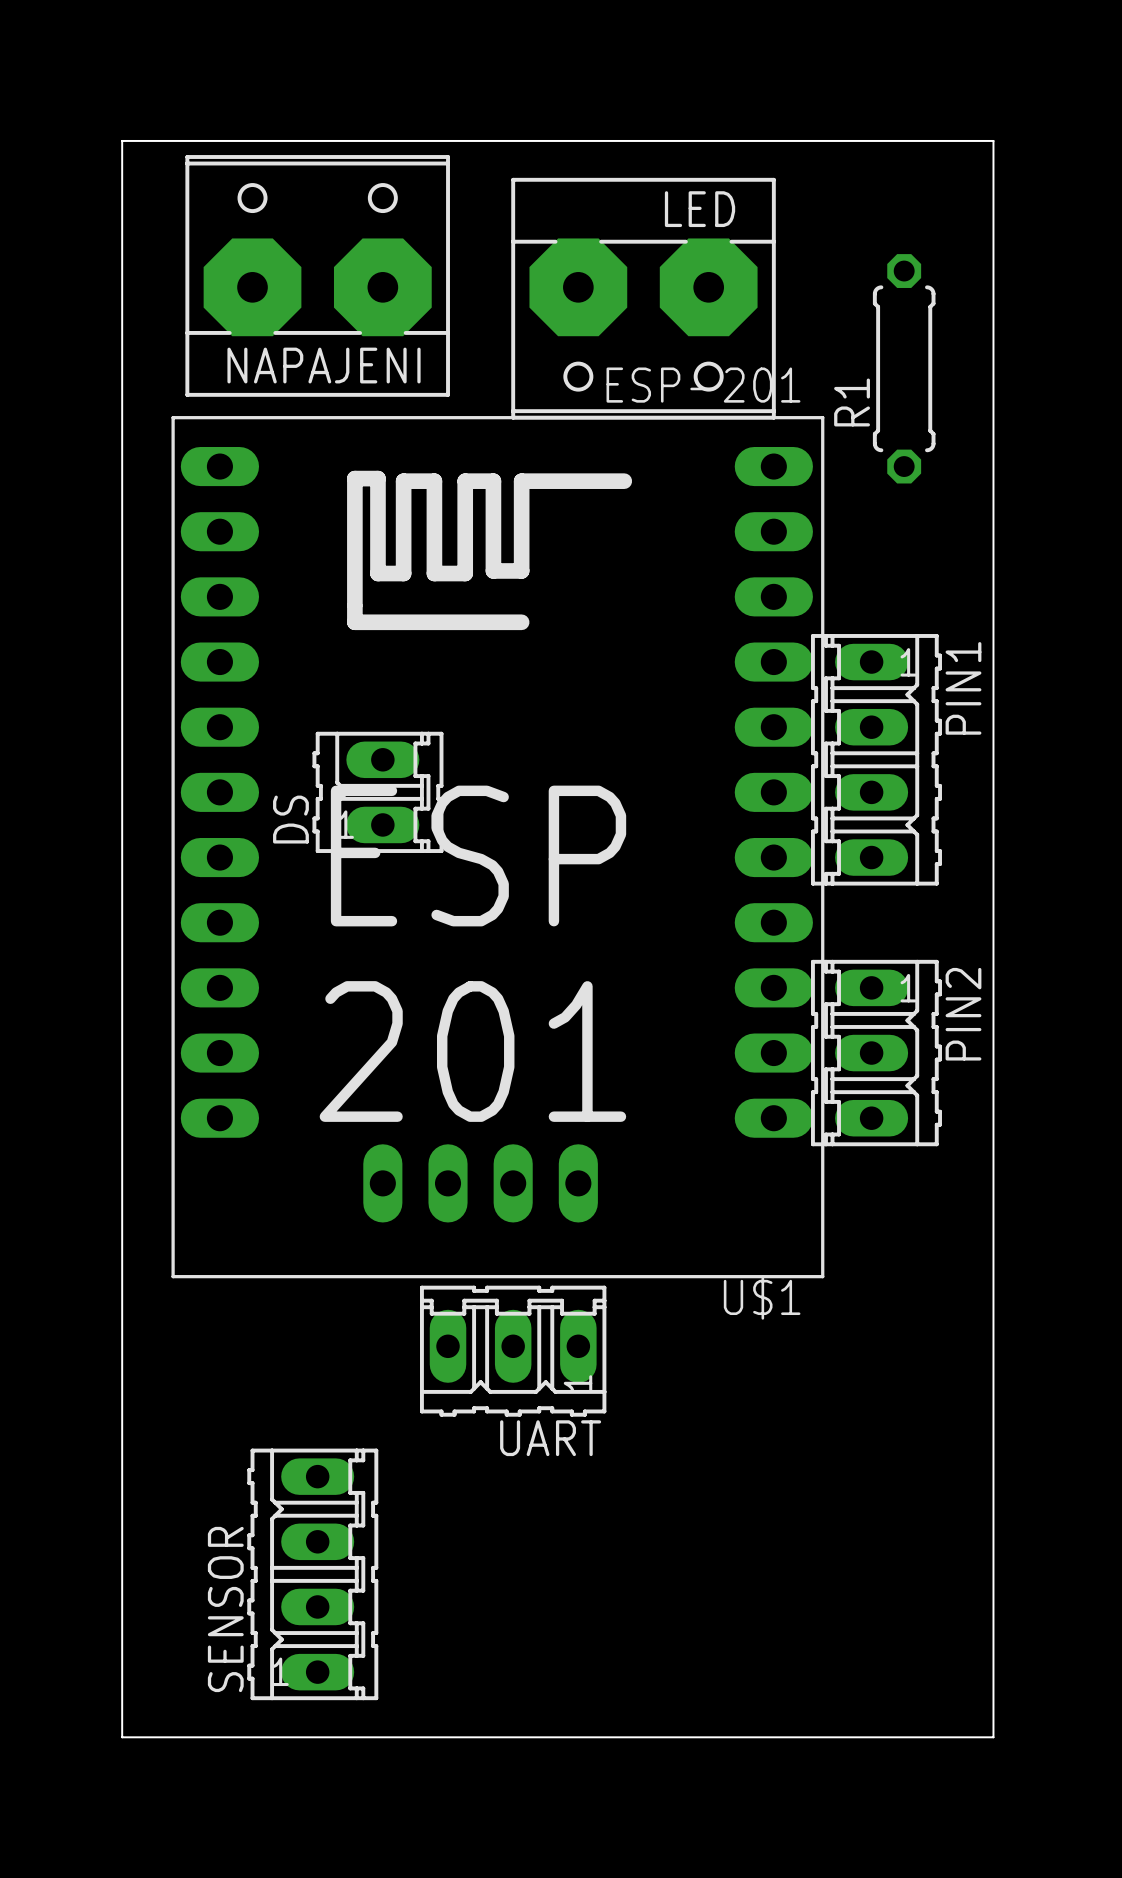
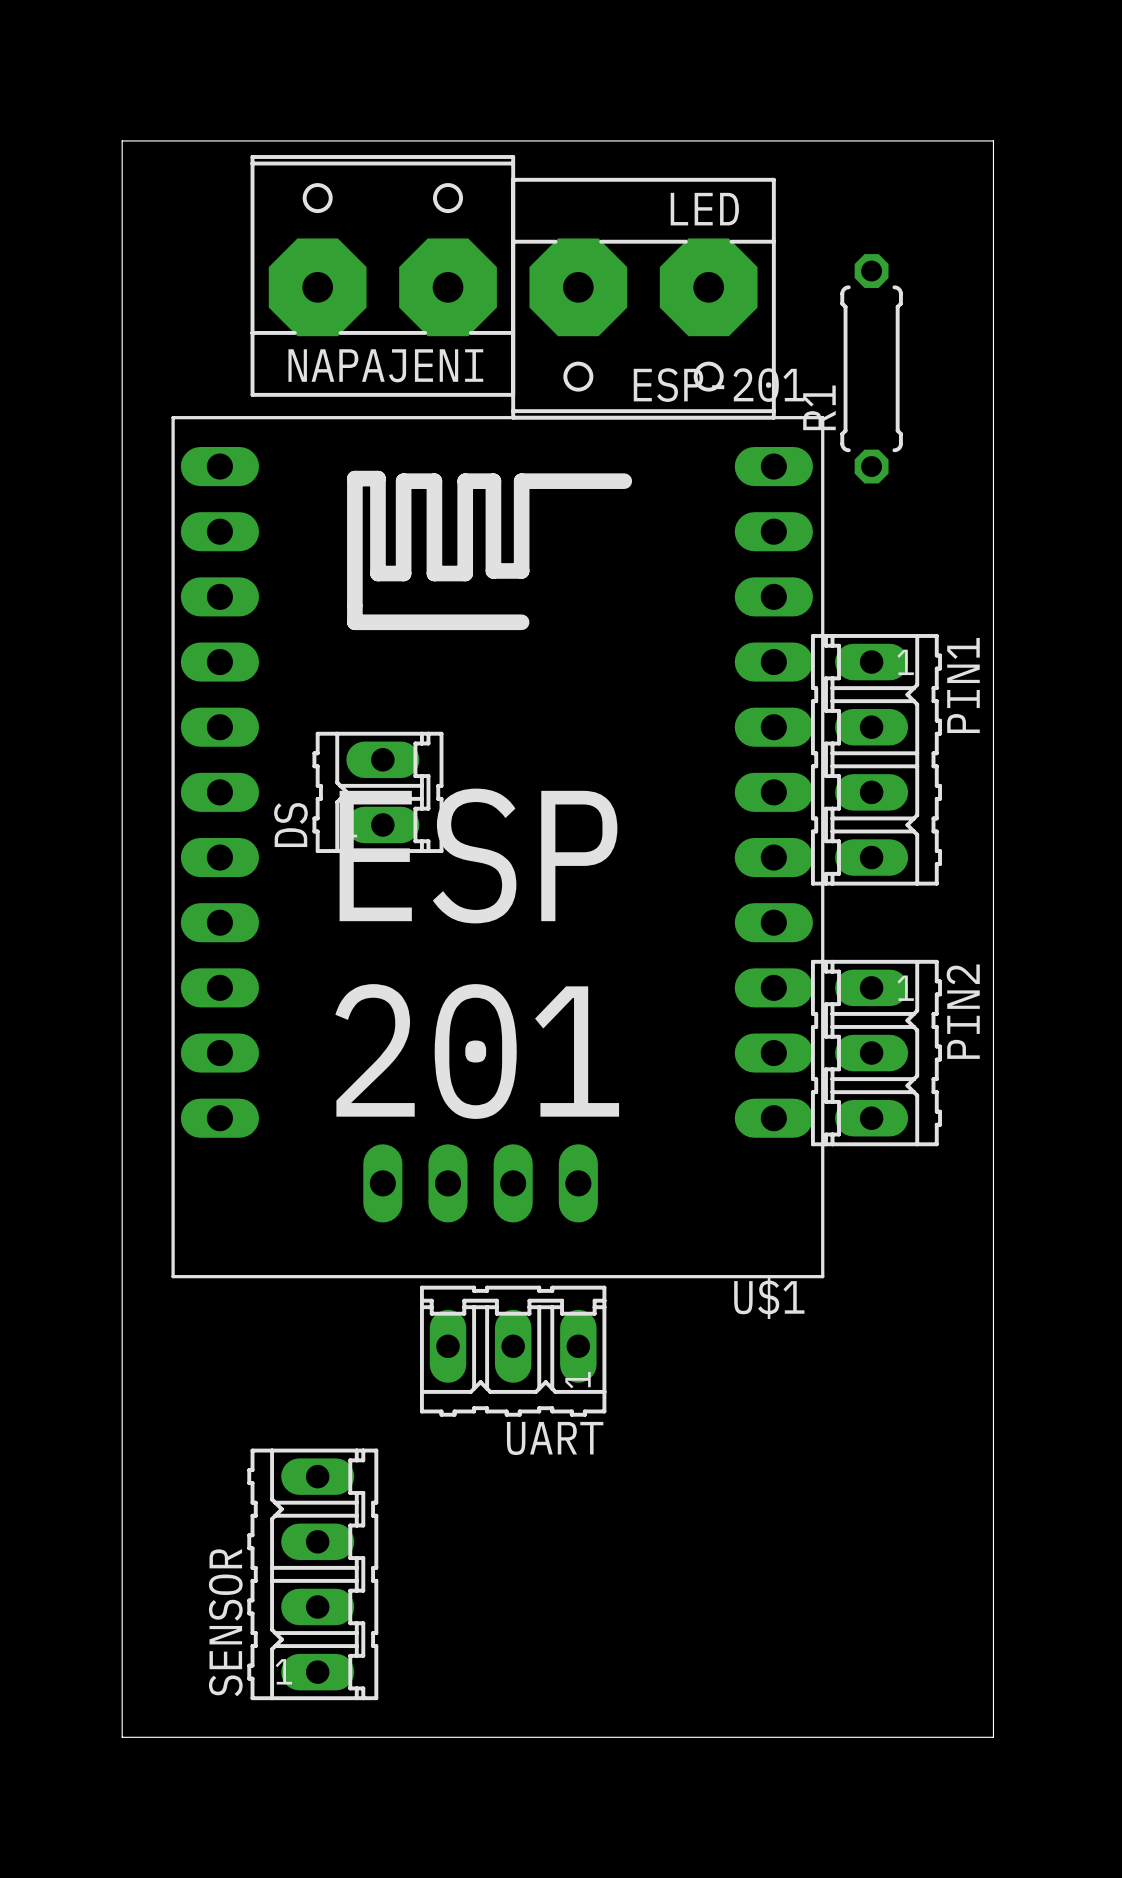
NAPAJENI position: (317, 275) -> (382, 275)
R1 position: (904, 368) -> (871, 368)

